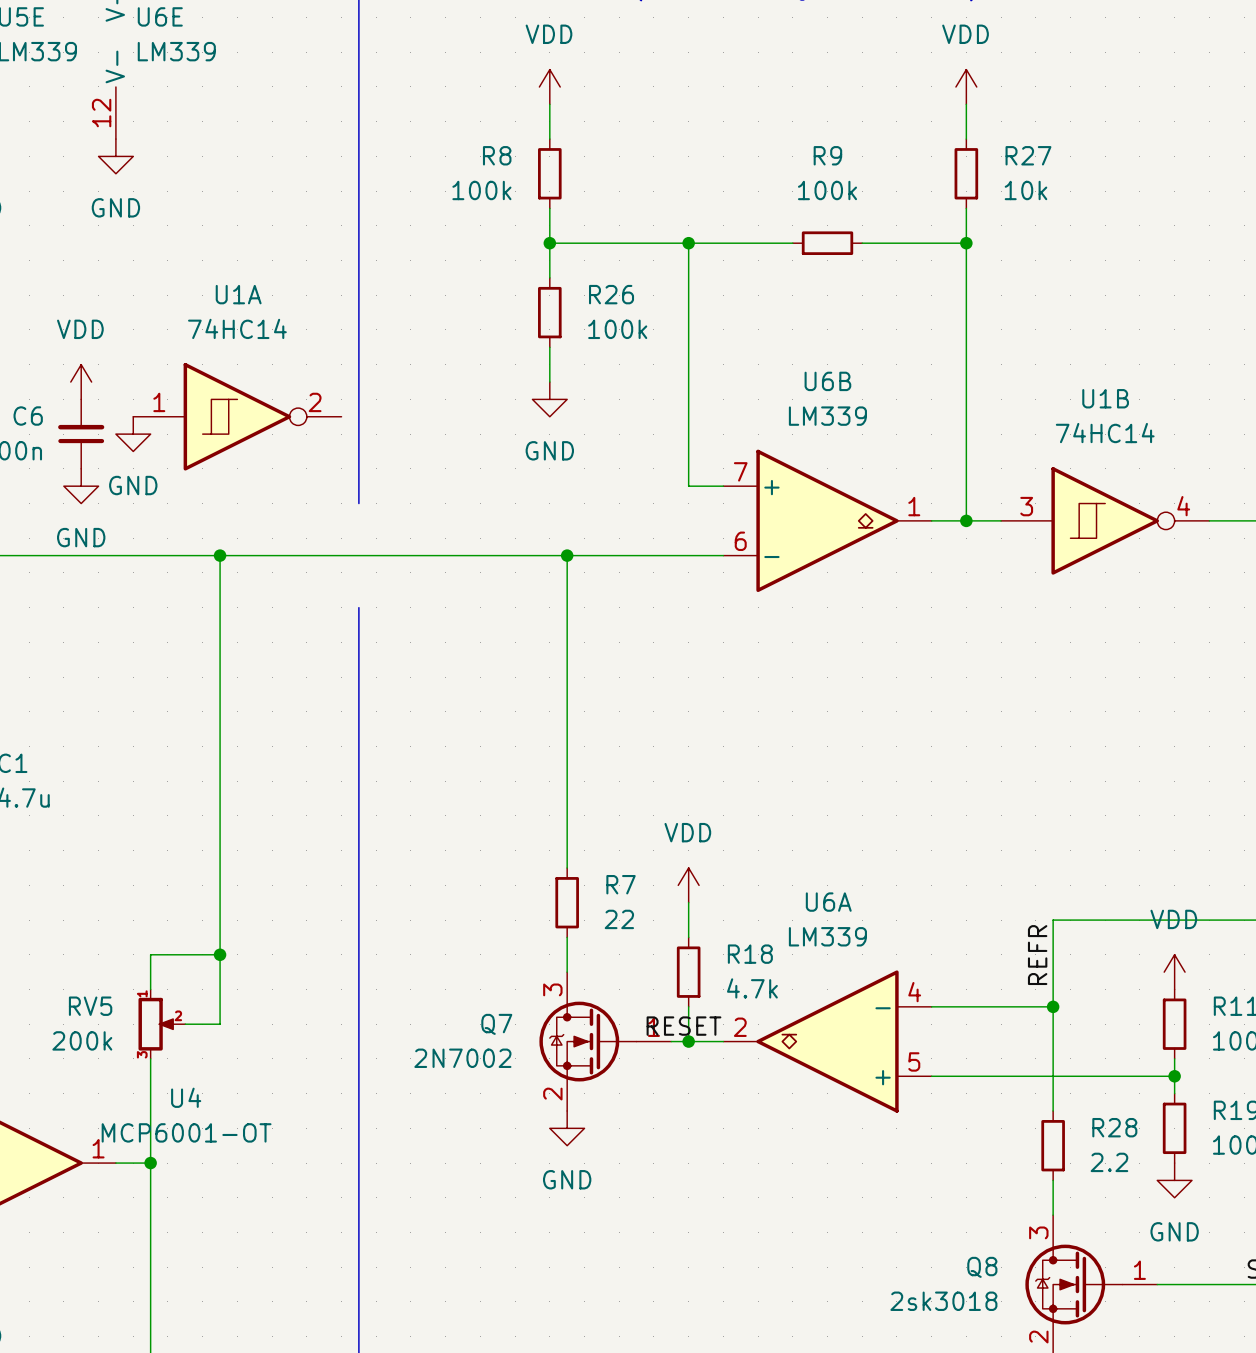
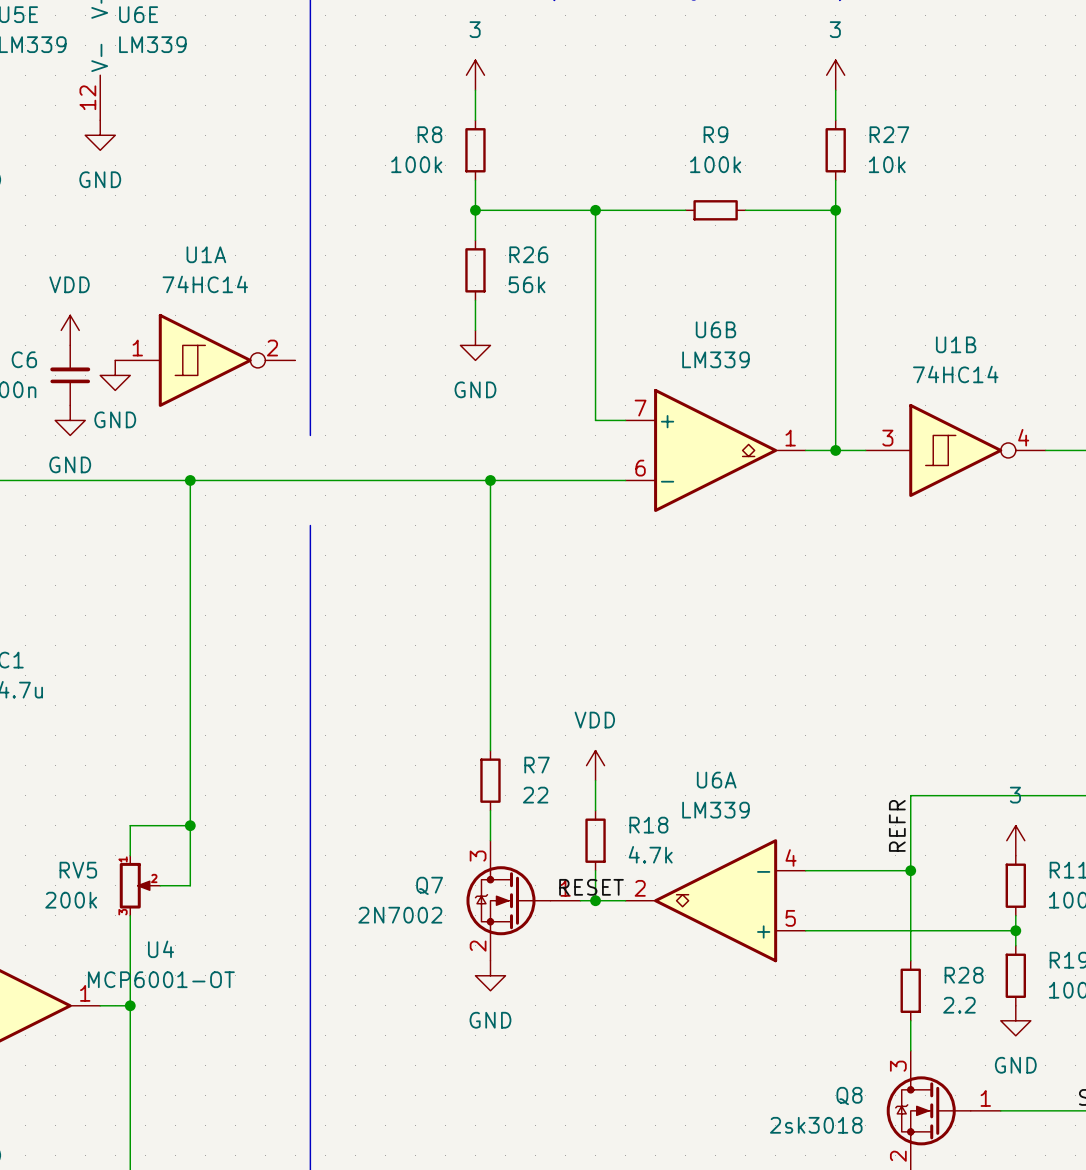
power symbol: VDD (549, 86) -> 3 (475, 75)
power symbol: VDD (966, 86) -> 3 (835, 75)
R26 value: 100k (617, 329) -> 56k (527, 284)
power symbol: VDD (1174, 972) -> 3 (1015, 840)

